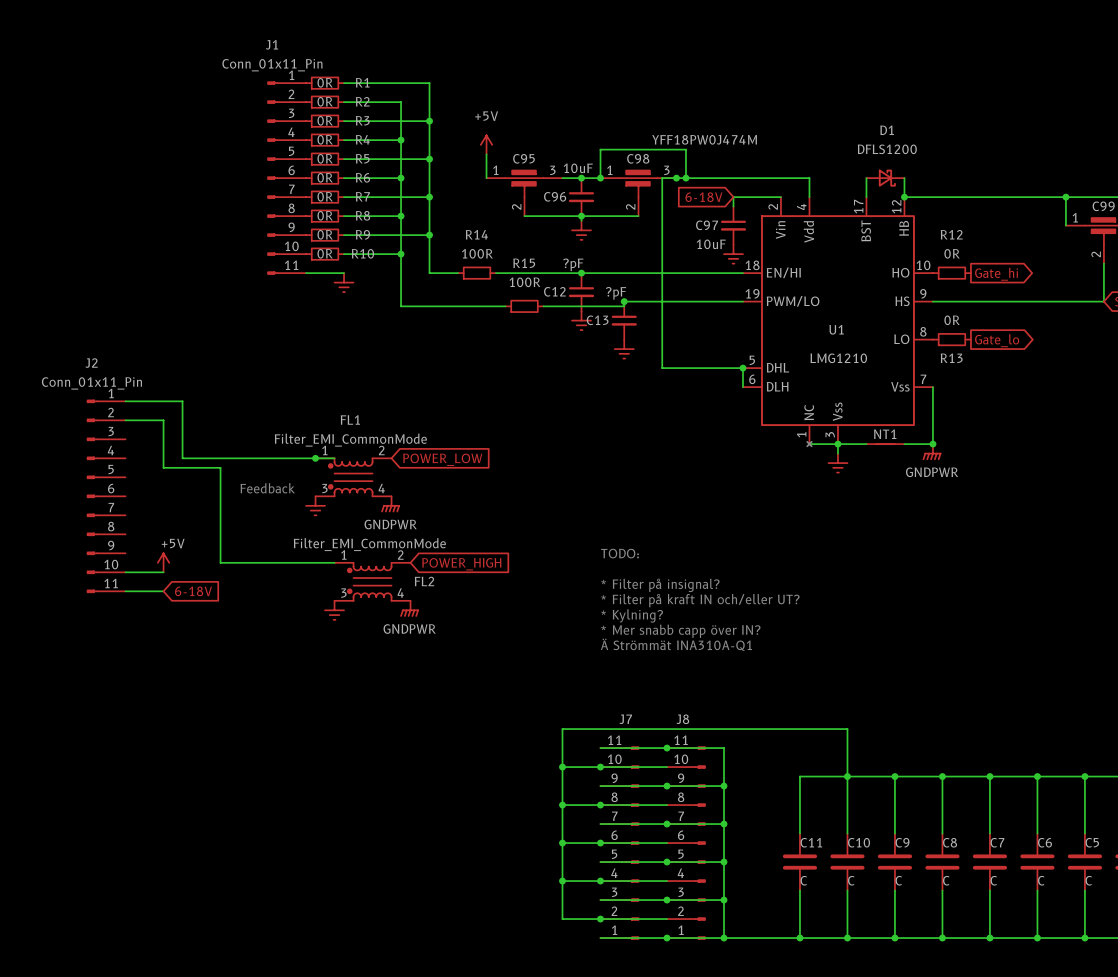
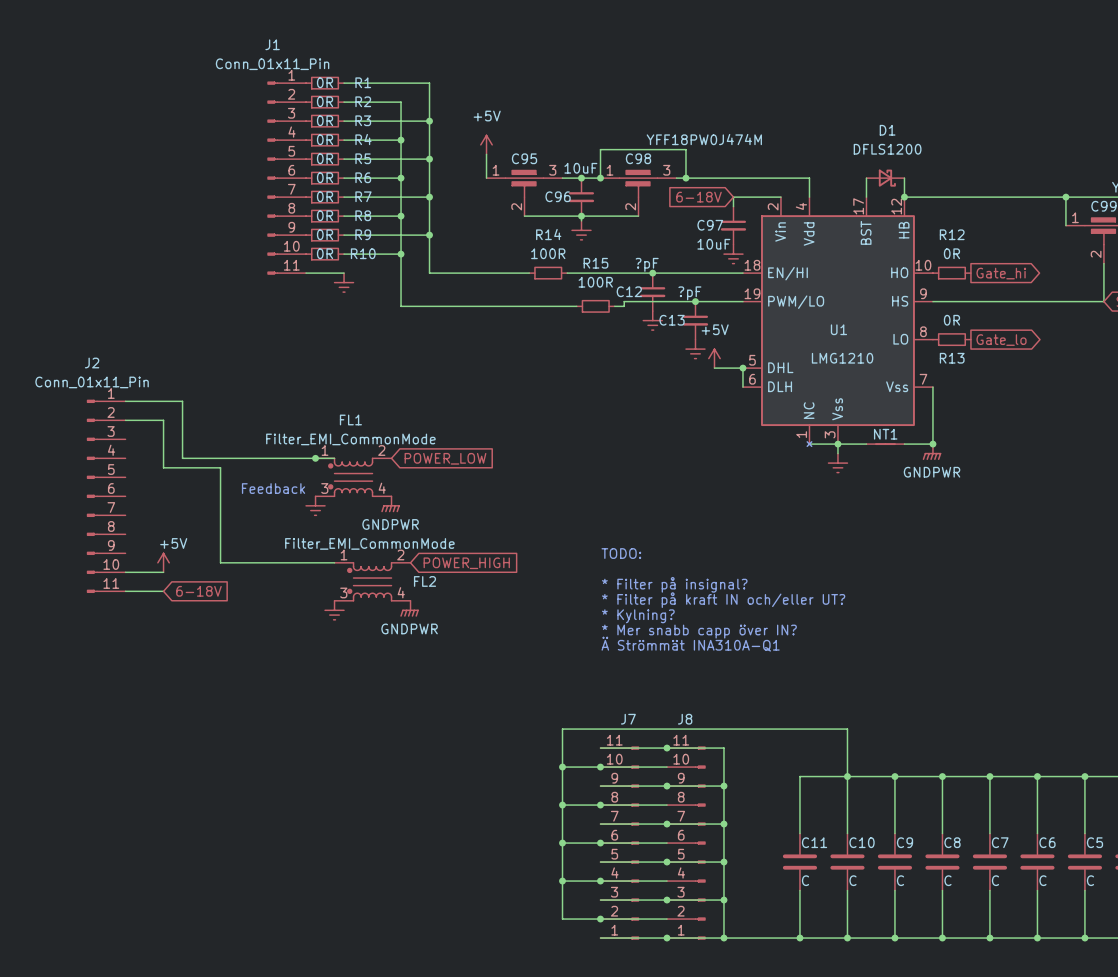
wire: (676, 178) (662, 178) (662, 368) (714, 368) -> none
junction: (676, 178) -> none
R14 position: (477, 273) -> (548, 273)
wire: (529, 273) (567, 273) -> (458, 273) (496, 273)
junction: (581, 273) -> none
junction: none -> (652, 273)
C12 position: (581, 292) -> (652, 292)
junction: (624, 301) -> none
junction: none -> (695, 301)
R15 position: (524, 306) -> (595, 306)
wire: (576, 306) (614, 306) -> (505, 306) (543, 306)
power symbol: (581, 320) -> none
C13 position: (624, 320) -> (695, 320)
power symbol: none -> (652, 320)
power symbol: (624, 349) -> none
power symbol: none -> (695, 349)
power symbol: none -> +5V (714, 358)

